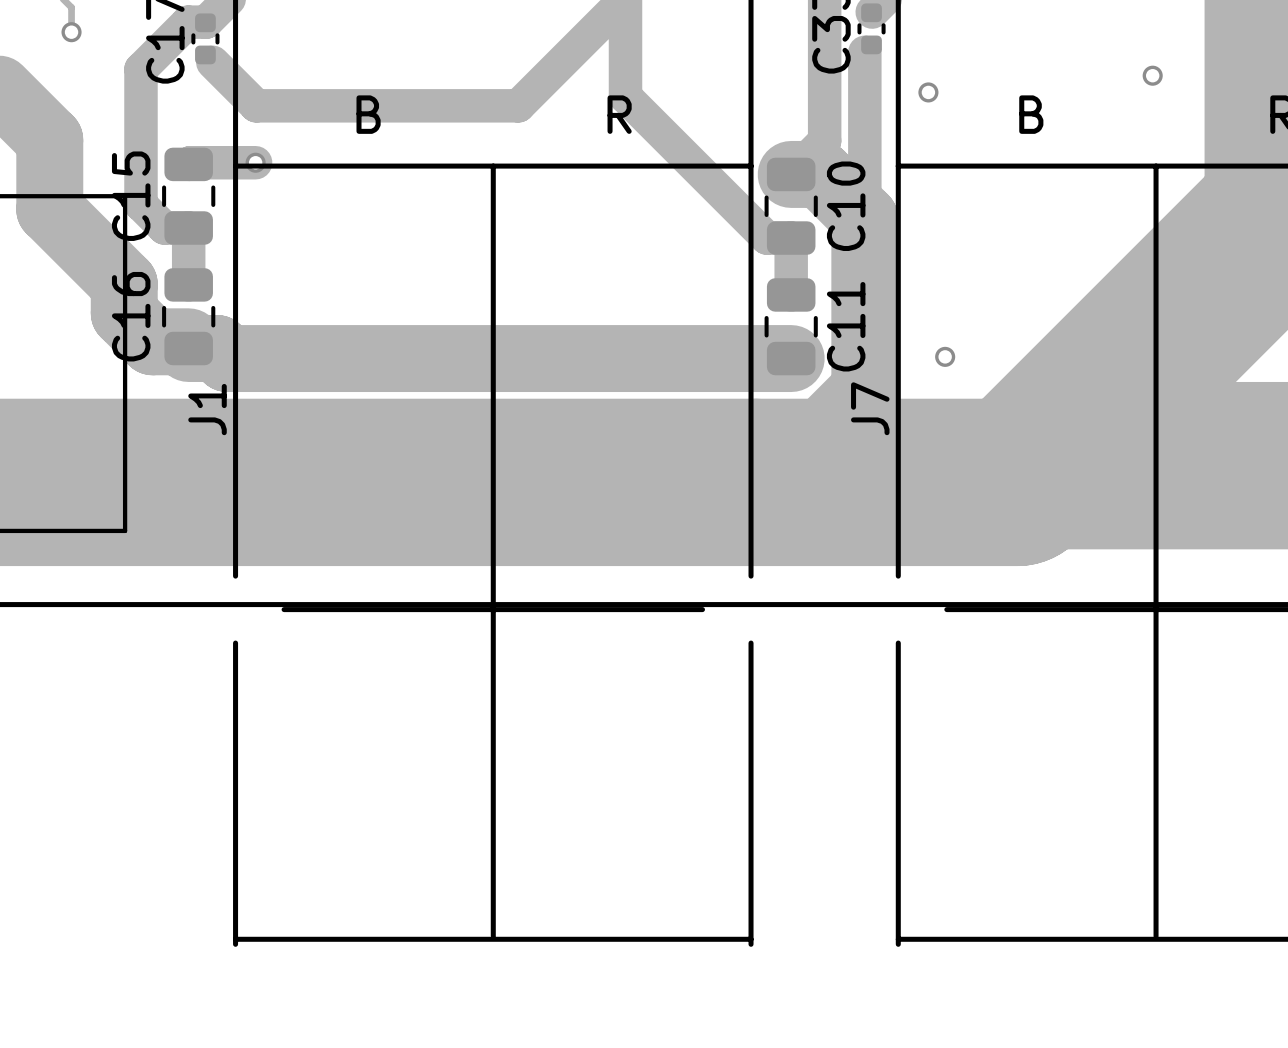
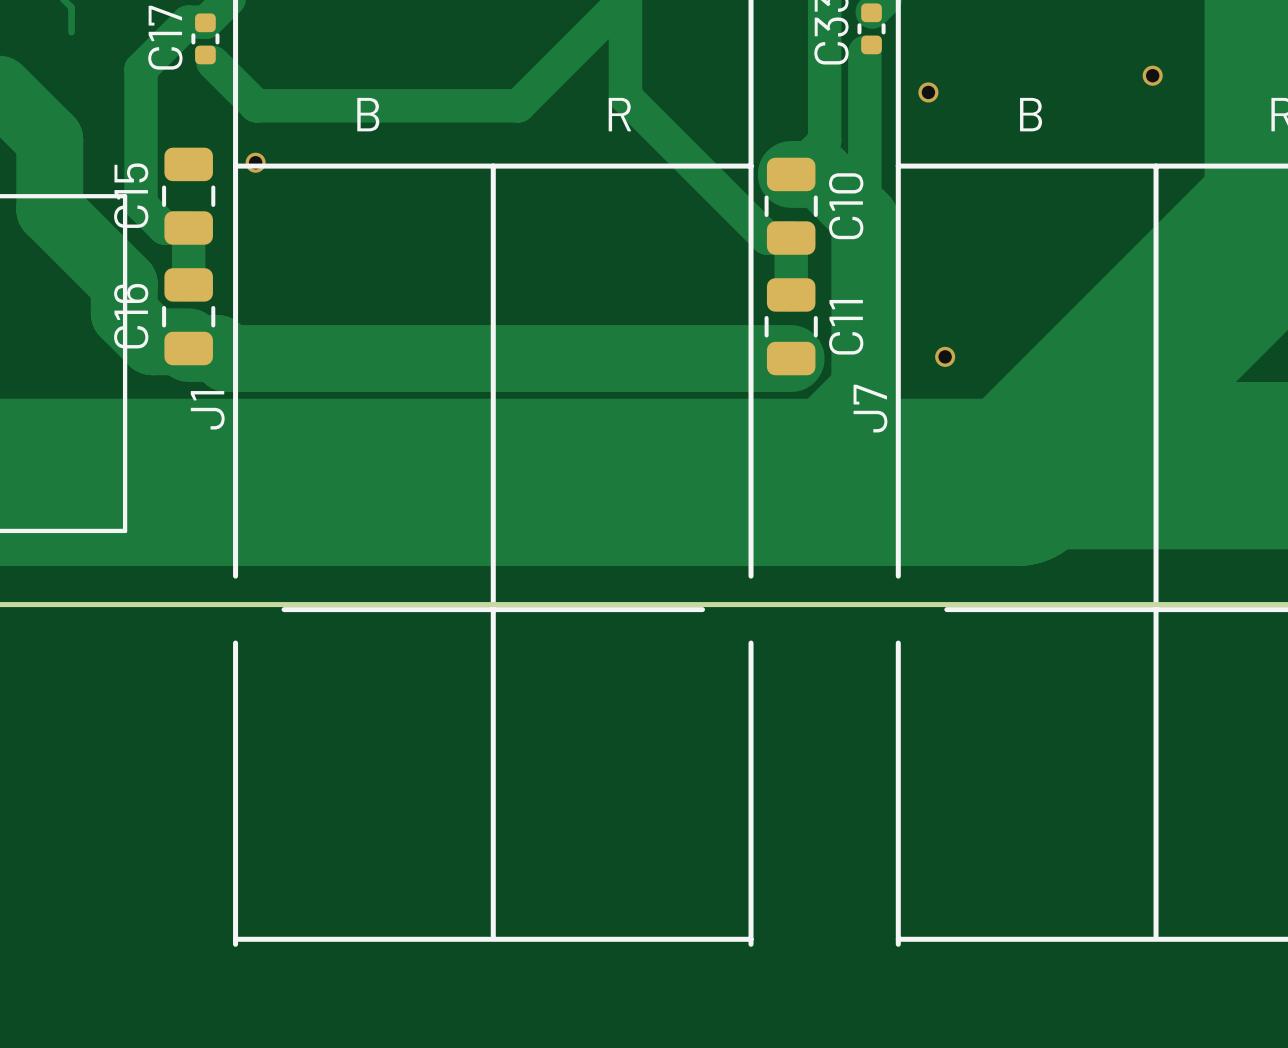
via: (71, 32) -> none
track: (255, 162) (190, 162) (188, 164) -> none

